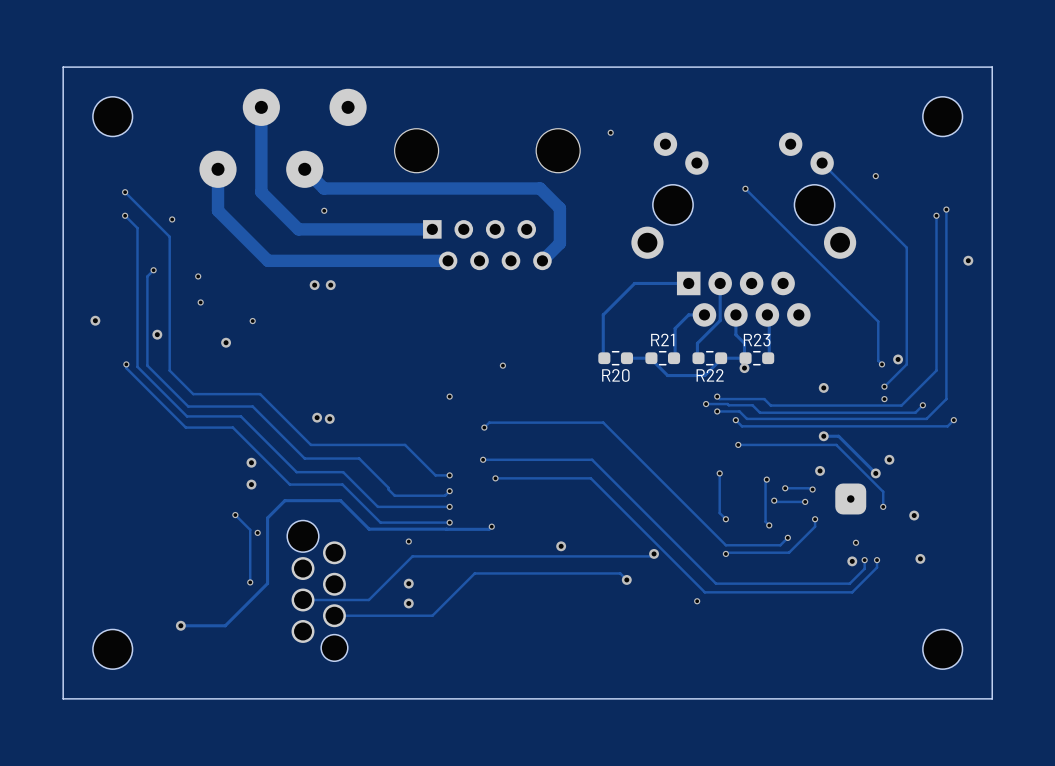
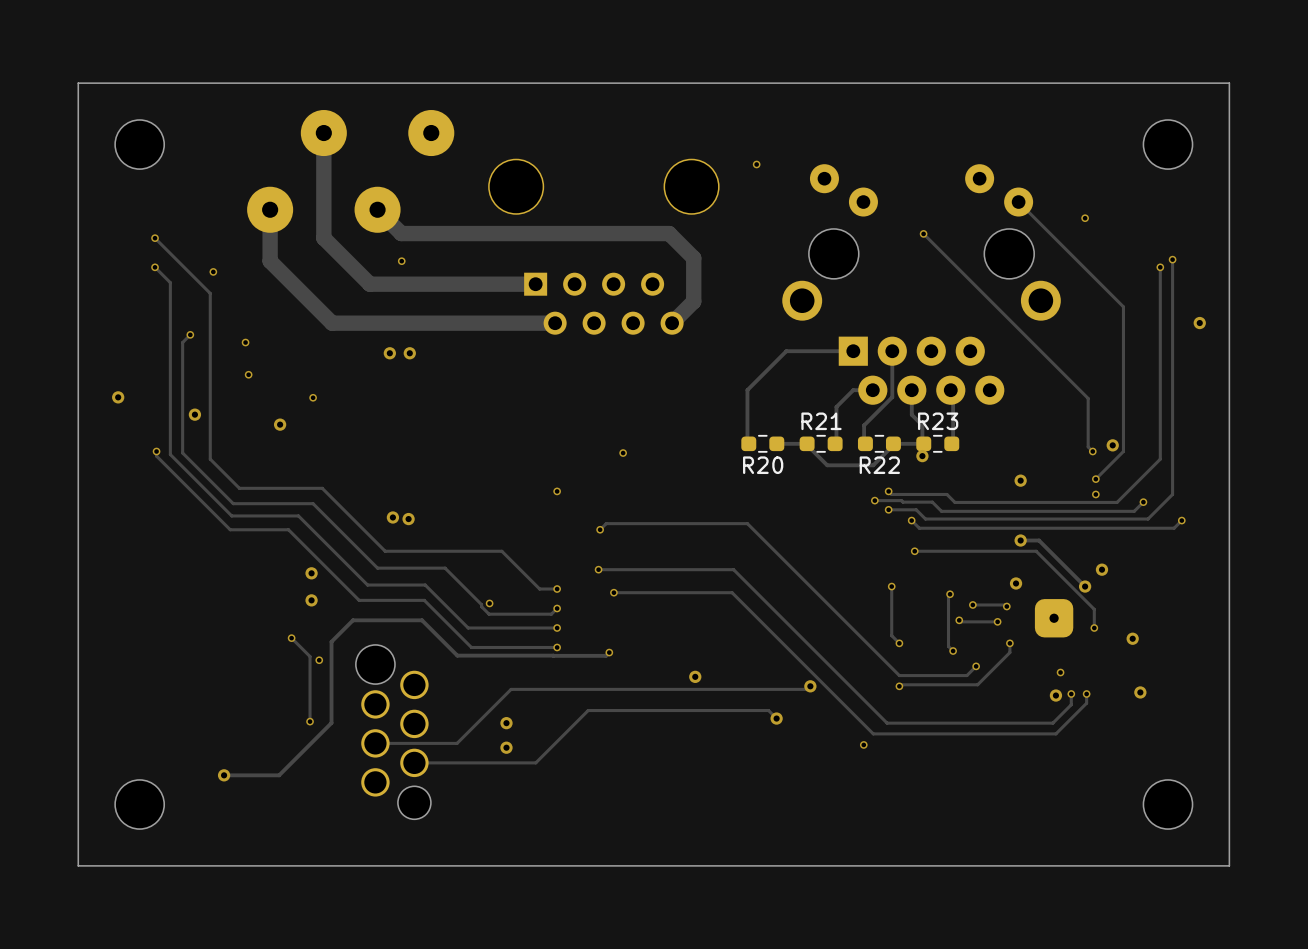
via position: (408, 541) -> (489, 603)

